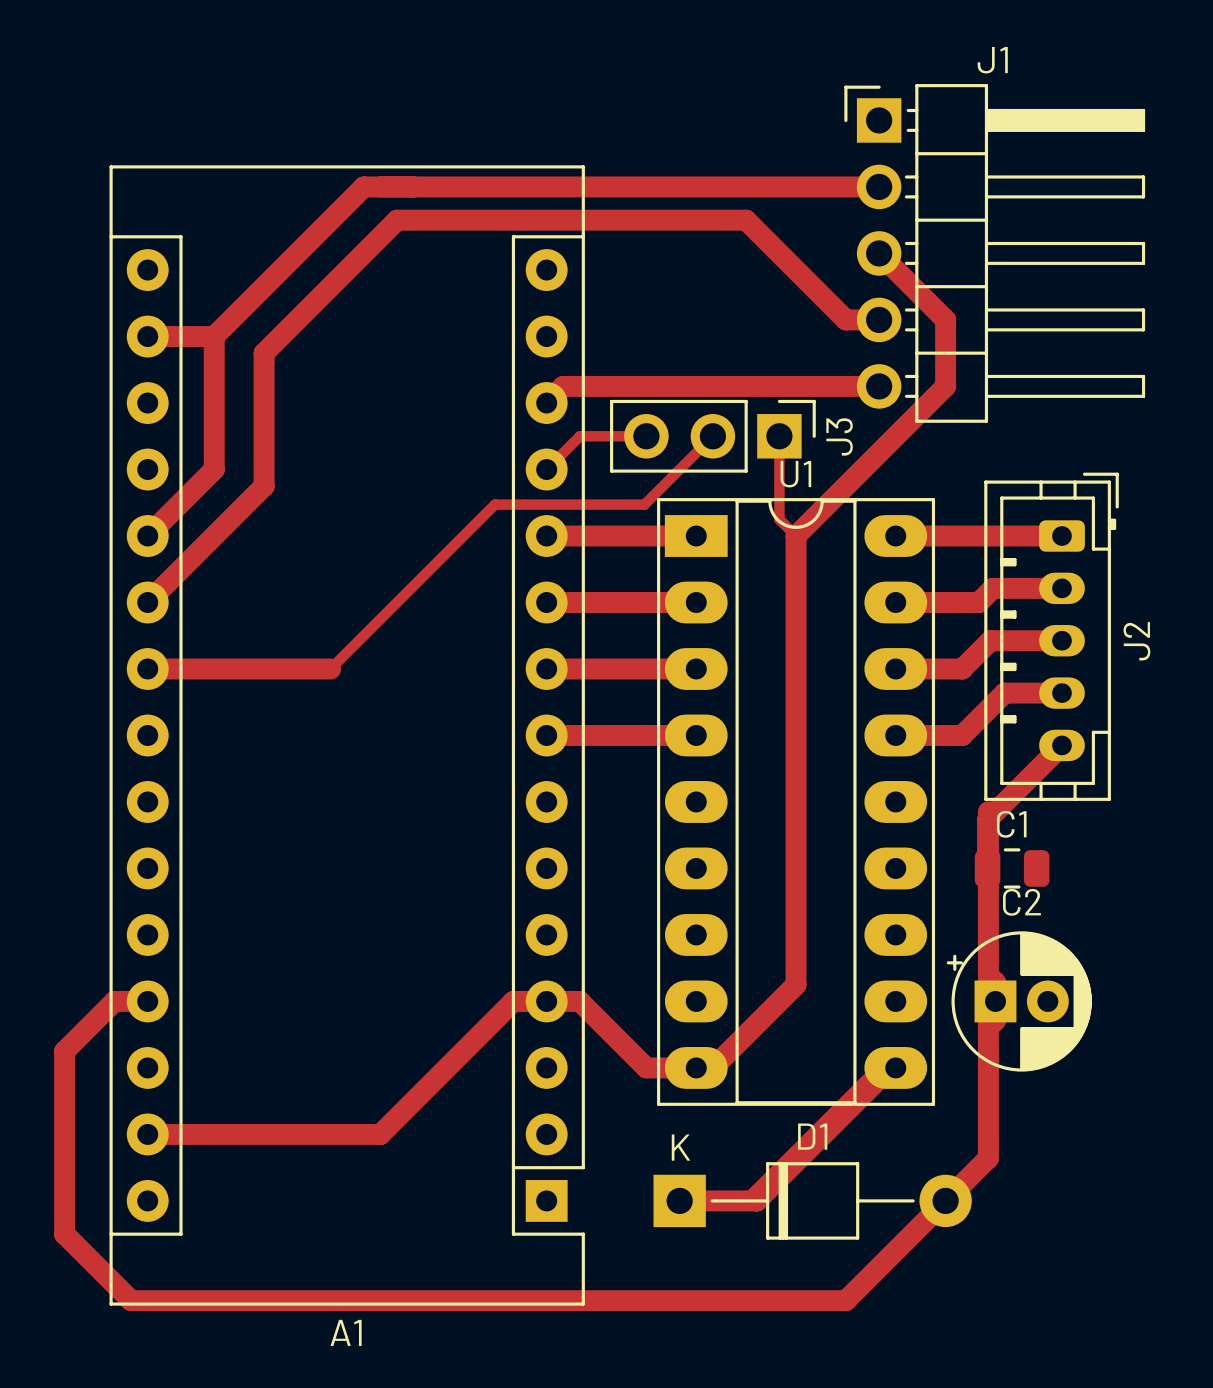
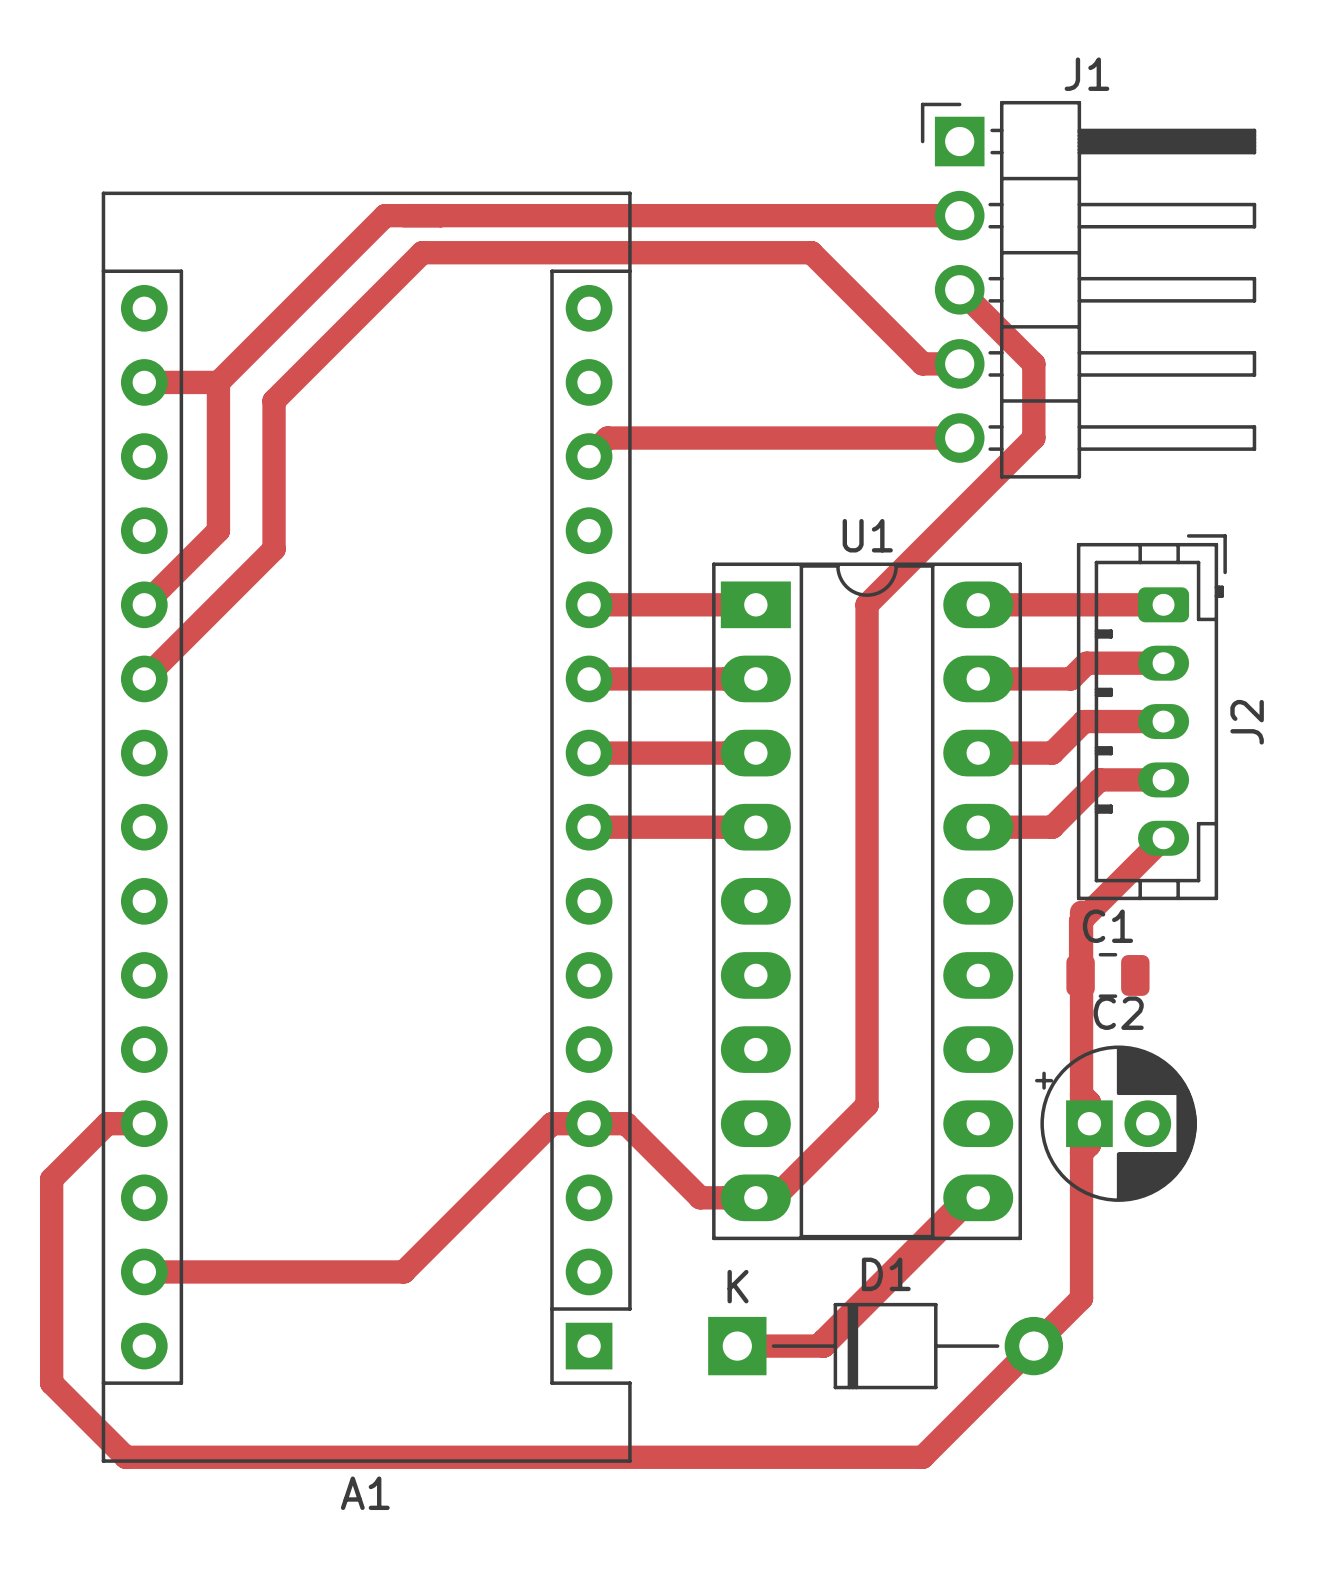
track: (646, 436) (579, 436) (546, 469) -> none
track: (712, 436) (644, 504) (494, 504) (330, 668) (147, 668) -> none
J3: (712, 436) -> none
track: (779, 436) (779, 519) (796, 536) -> none

